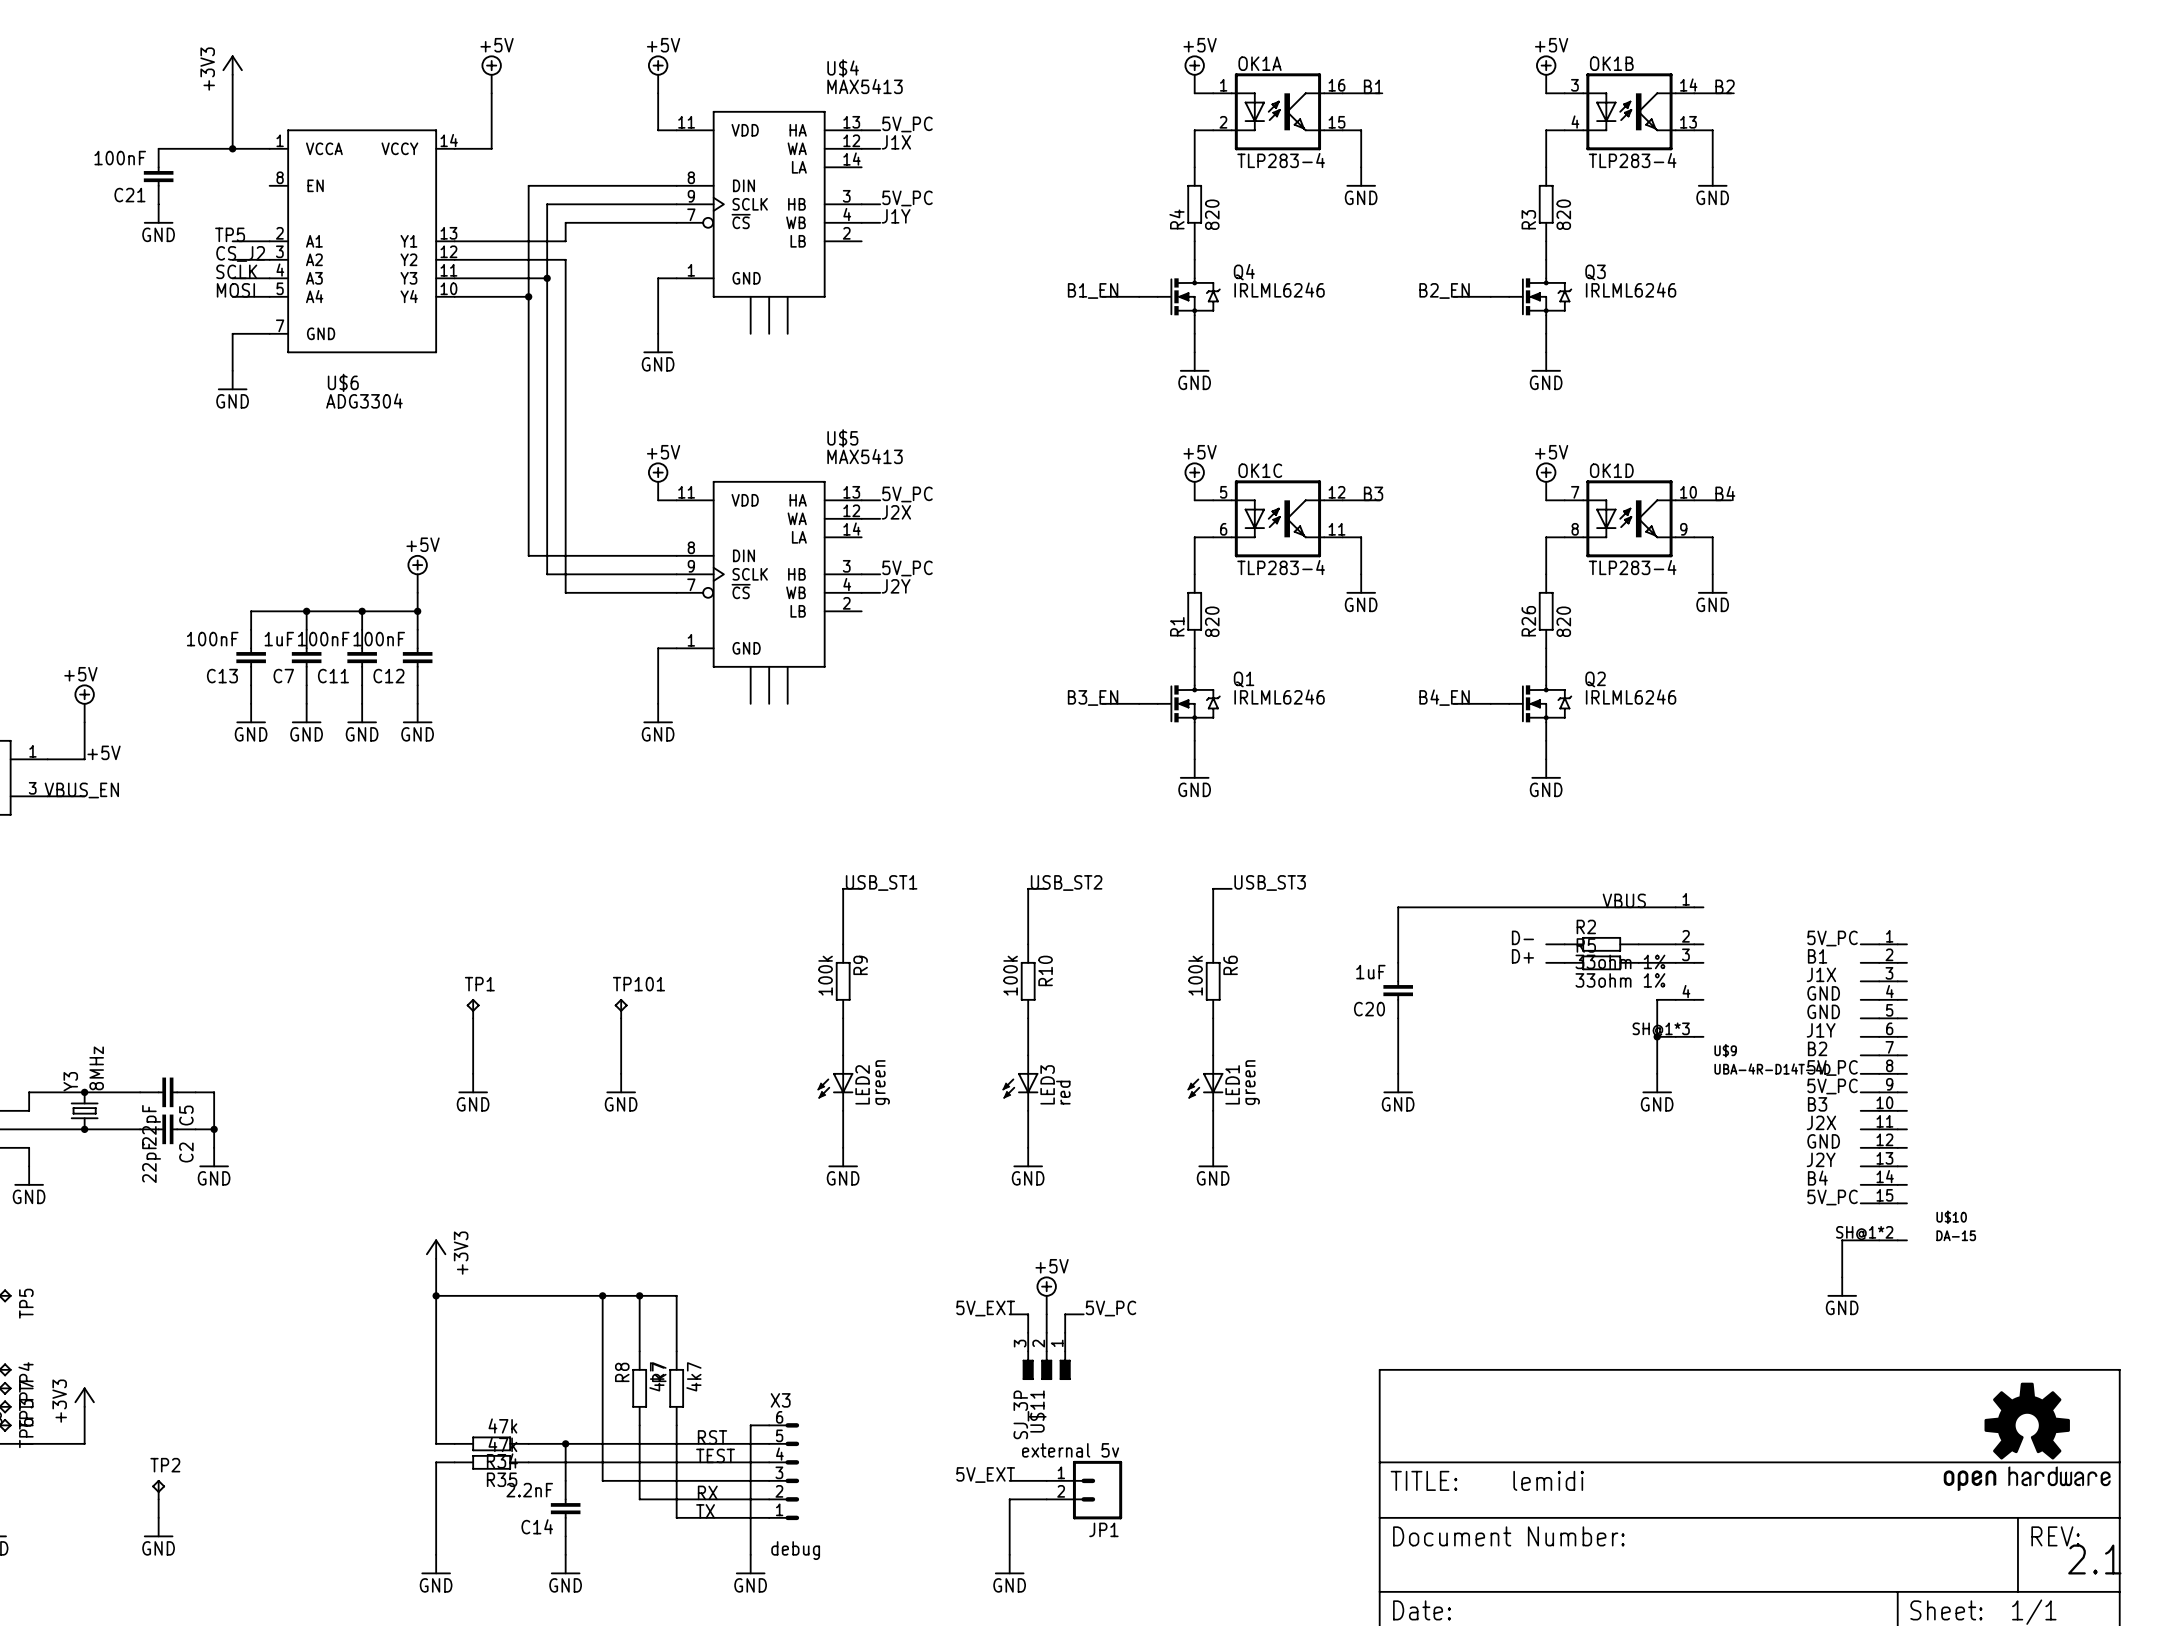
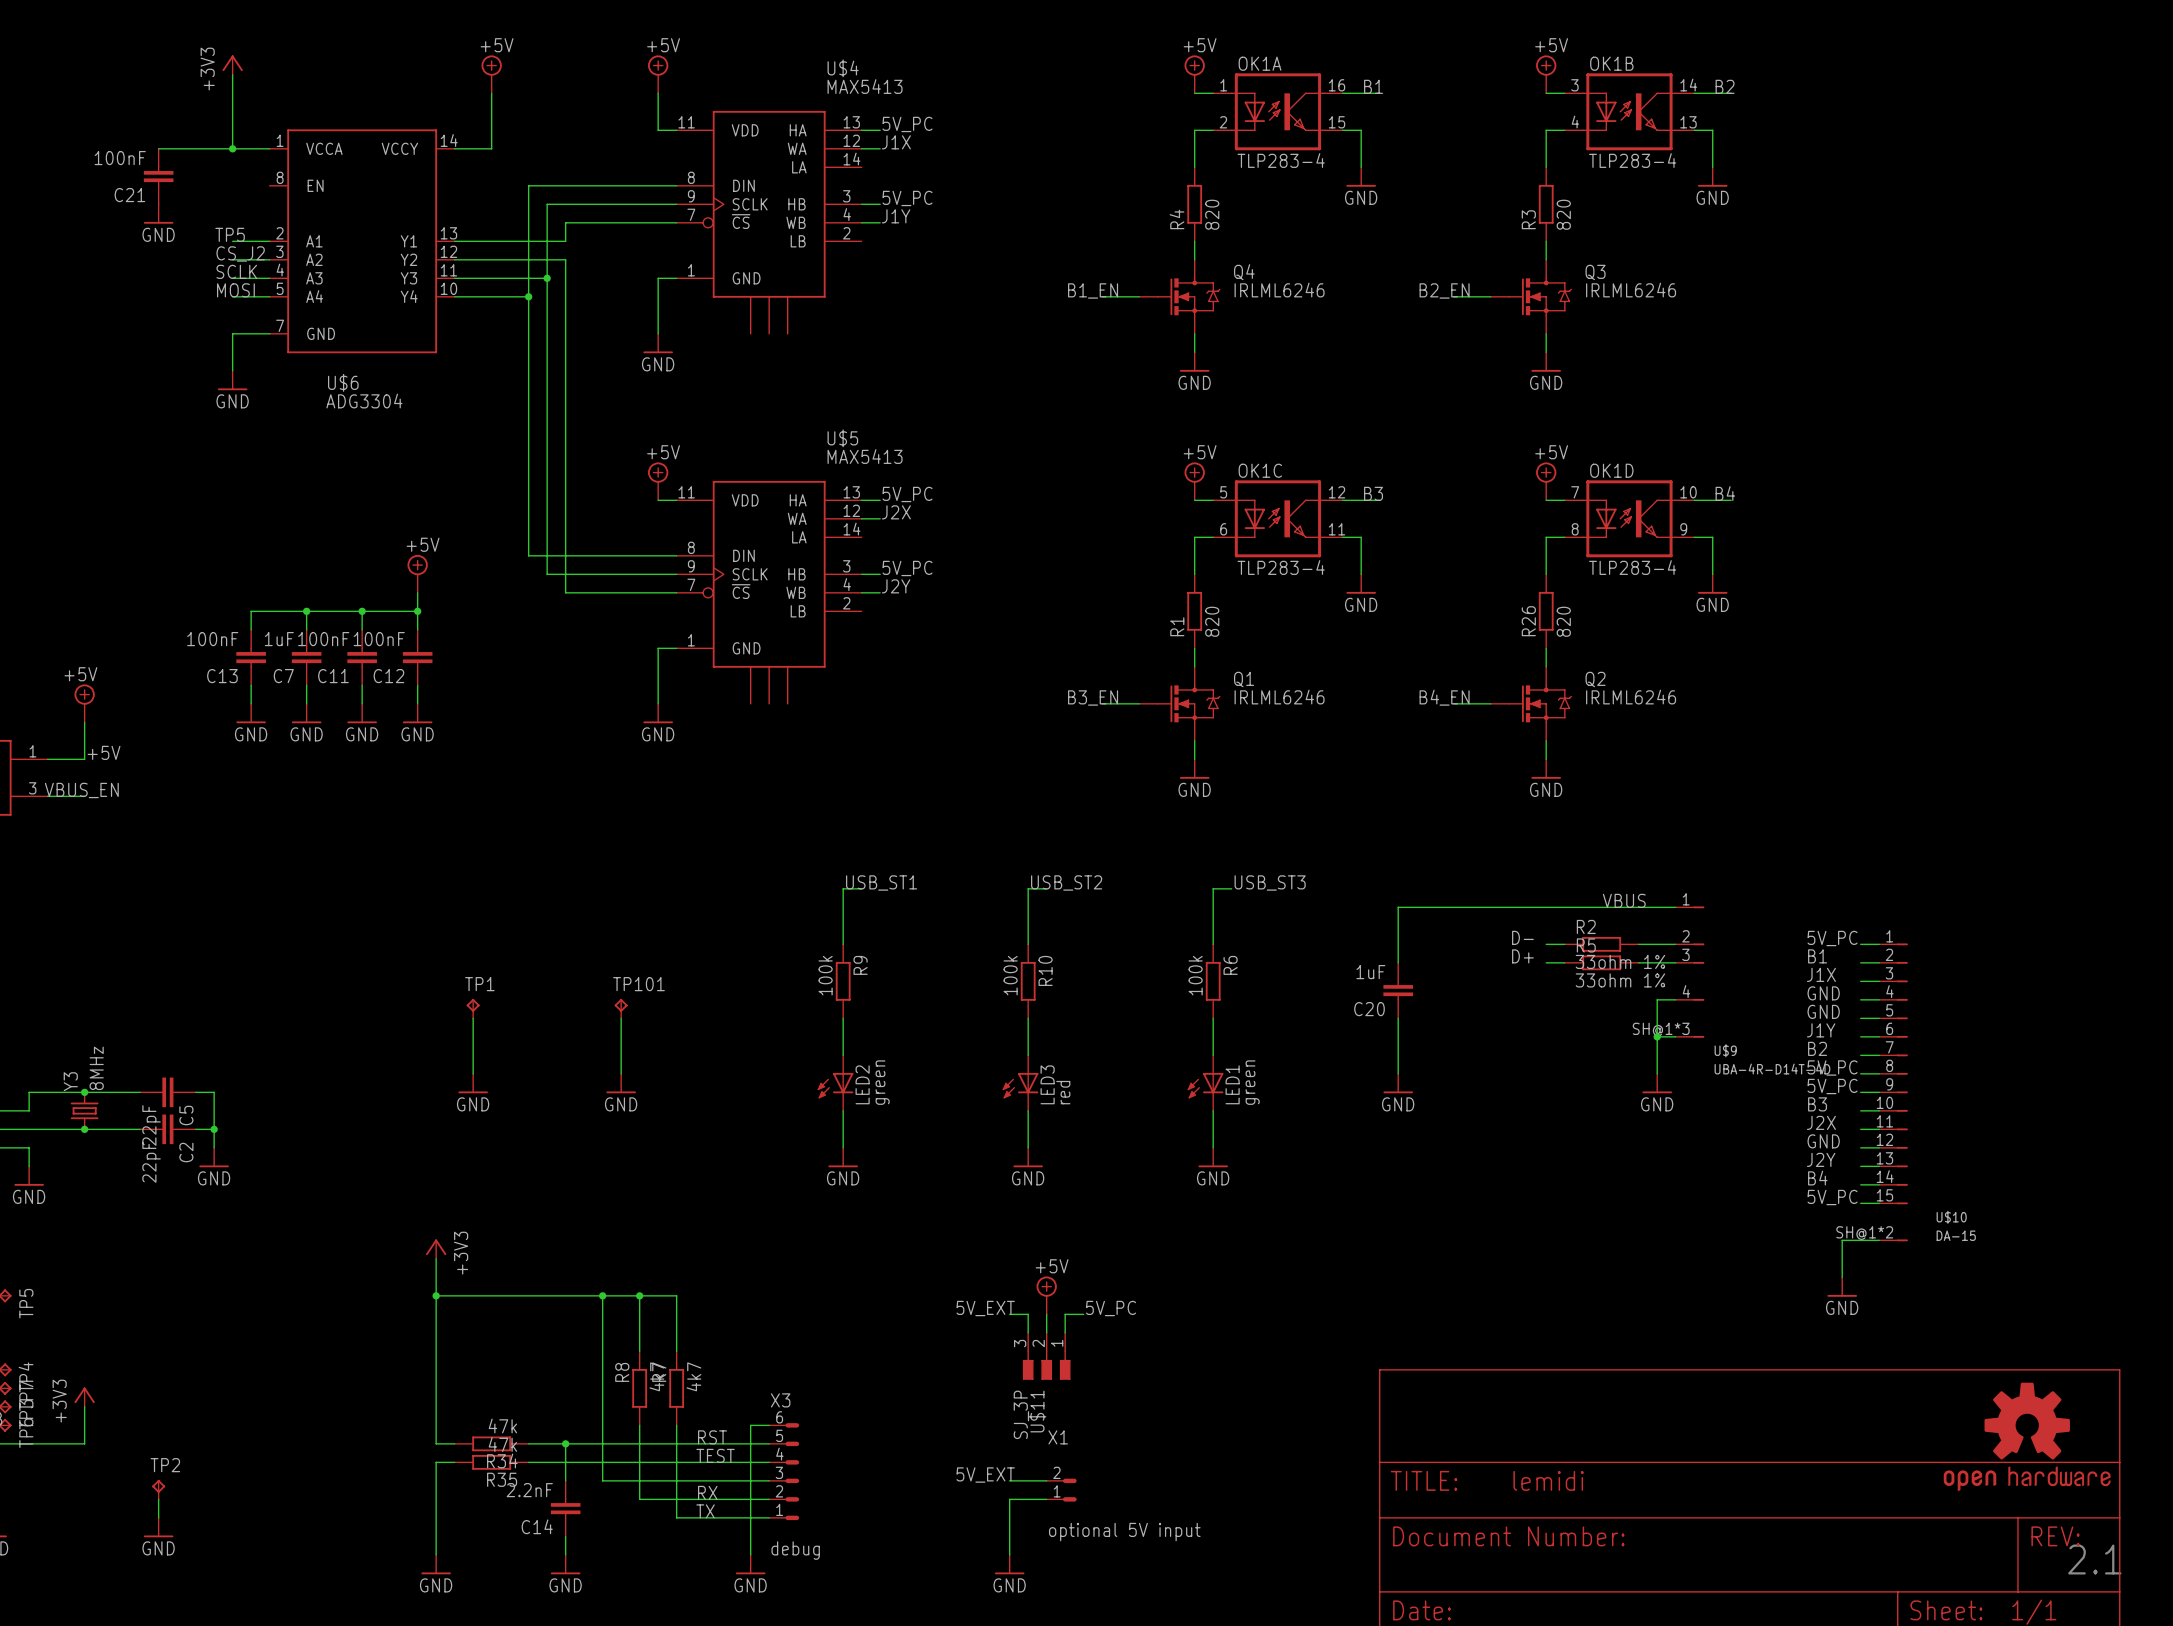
X1: none -> optional 5V input (1061, 1490)
JP1: external 5v (1084, 1490) -> none

